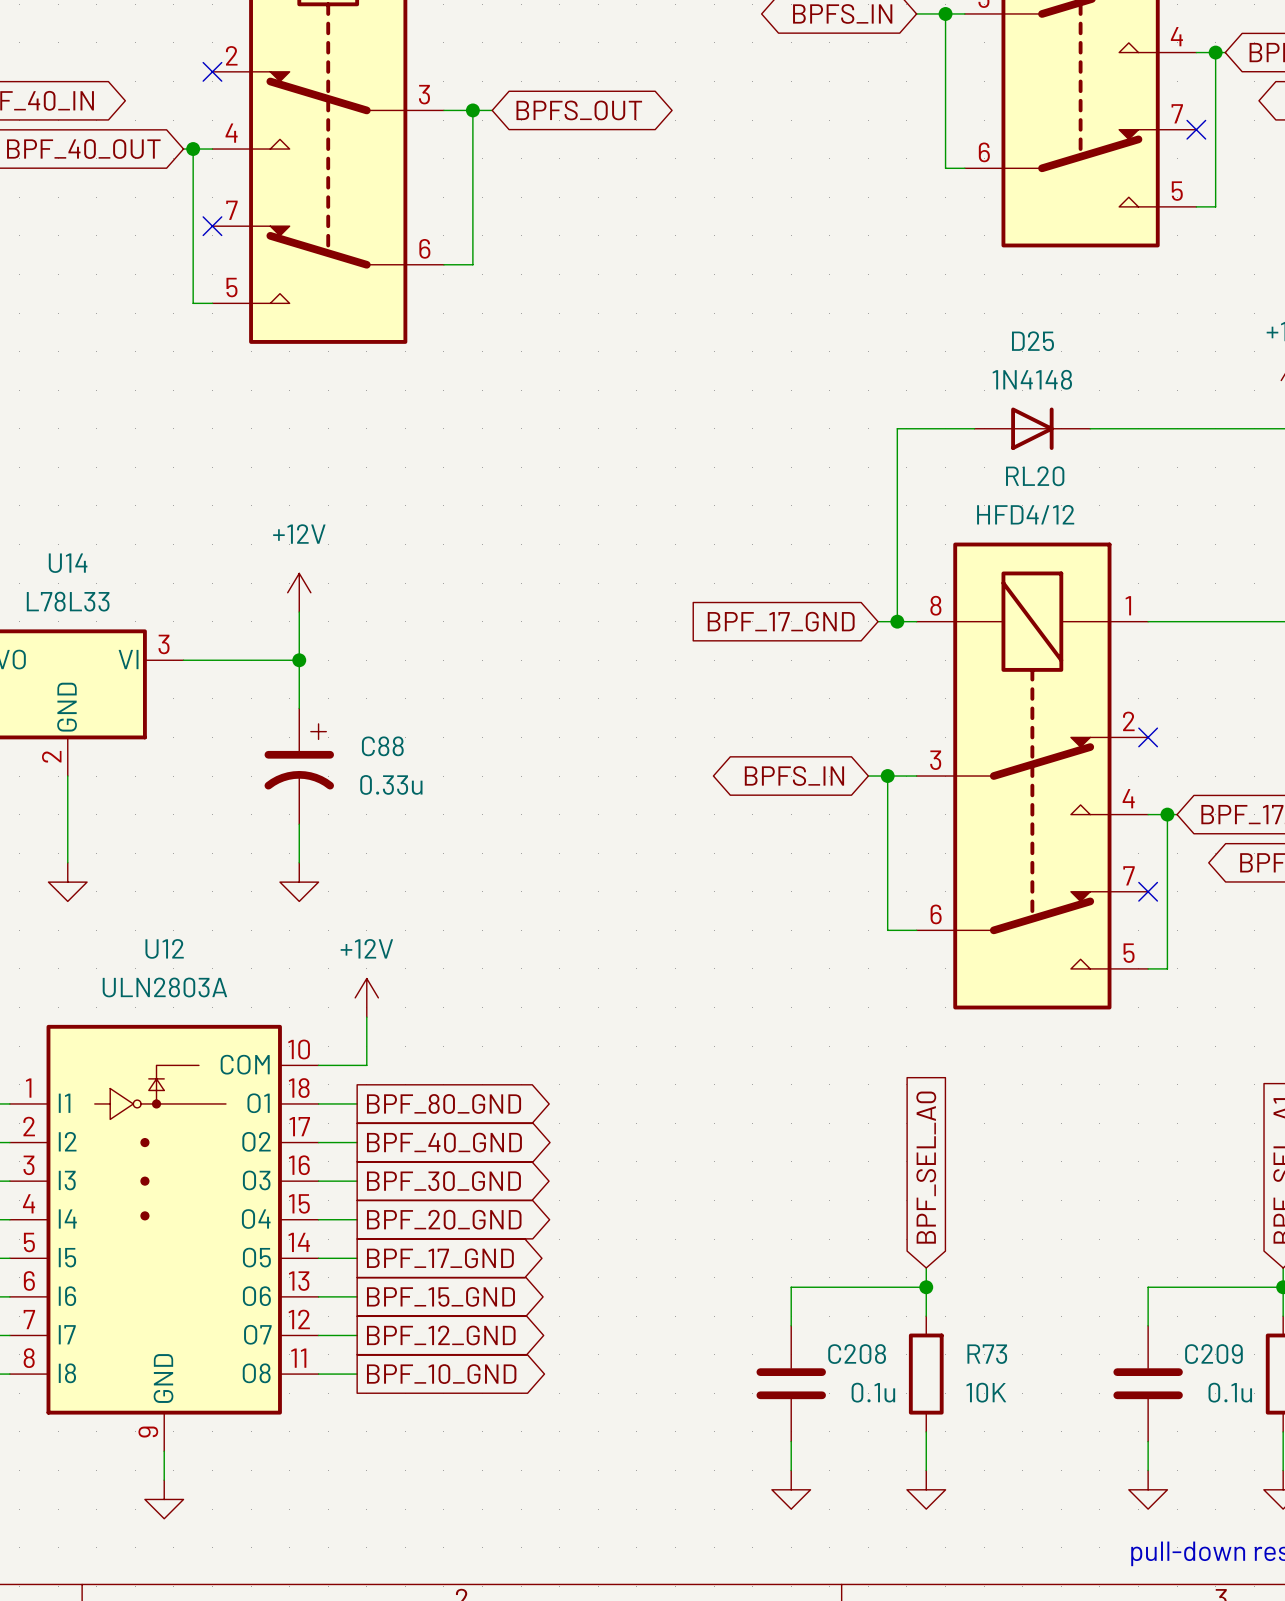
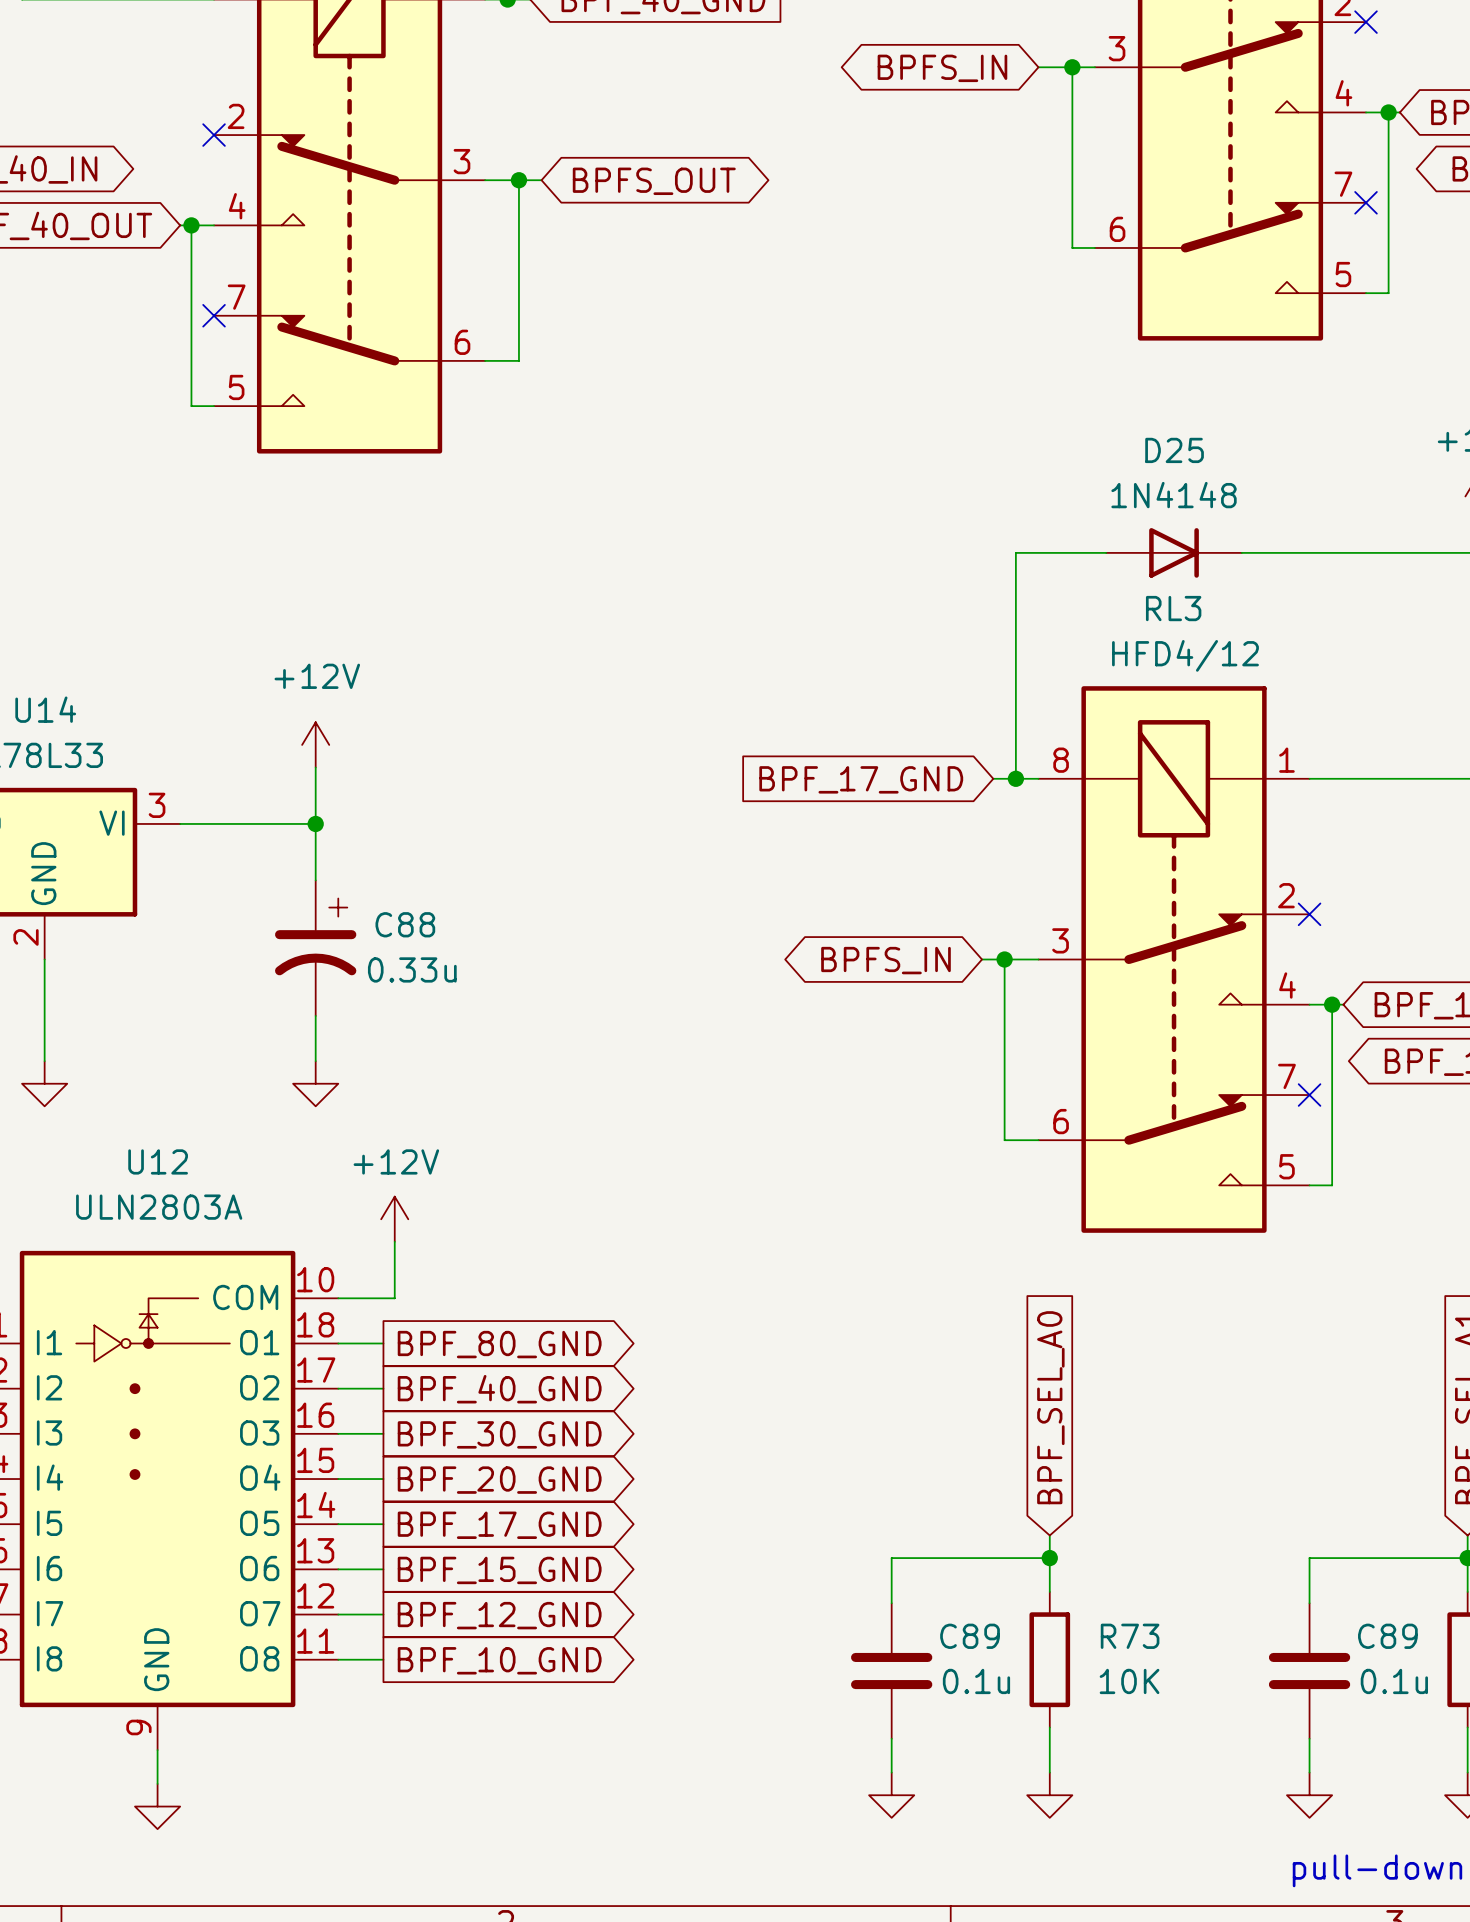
RL20 name: RL20 (1035, 476) -> RL3 (1173, 608)
C208 name: C208 (857, 1354) -> C89 (970, 1636)
C209 name: C209 (1213, 1354) -> C89 (1387, 1636)

